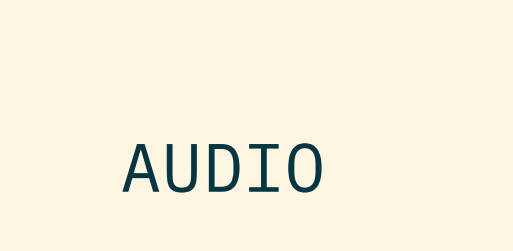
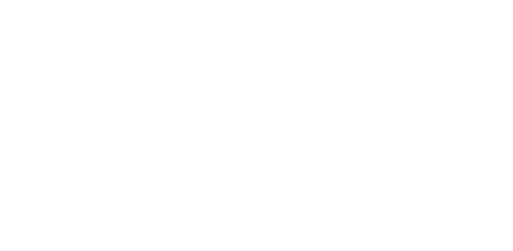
label: AUDIO (222, 167) -> none

